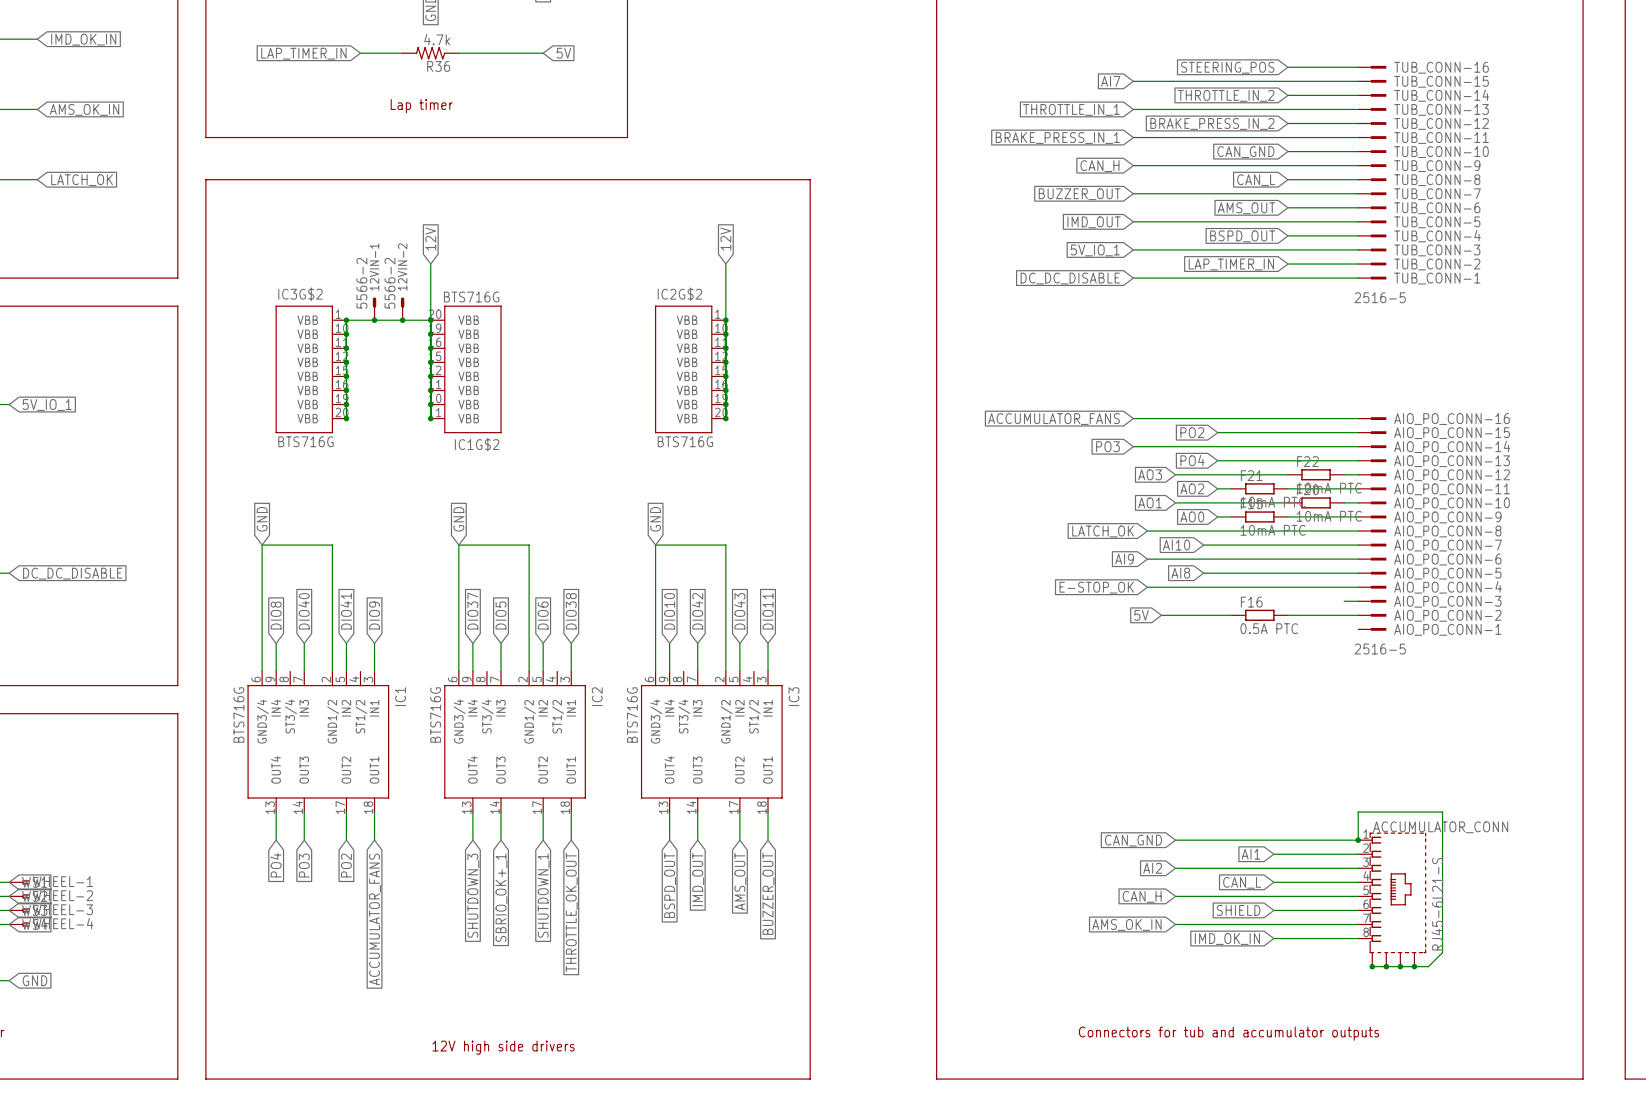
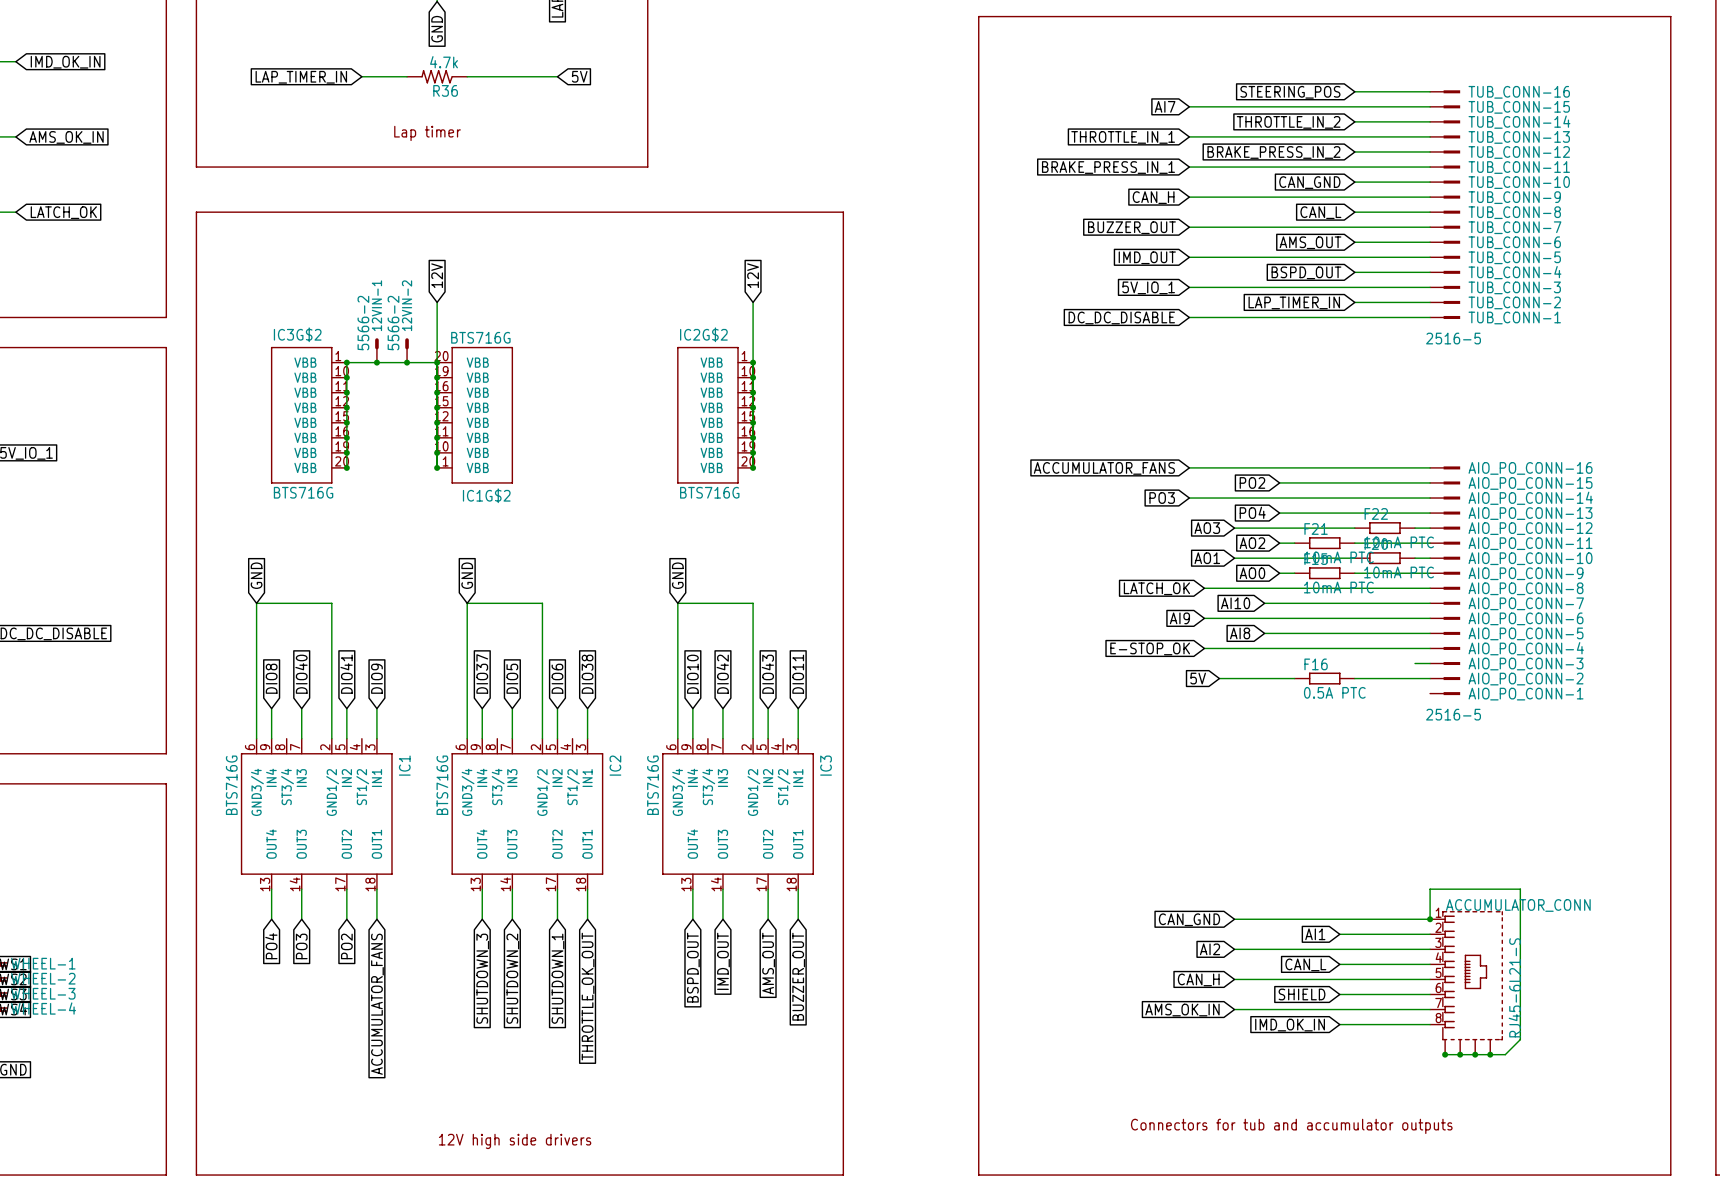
global label: SBRIO_OK+_1 (501, 897) -> SHUTDOWN_2 (512, 978)

